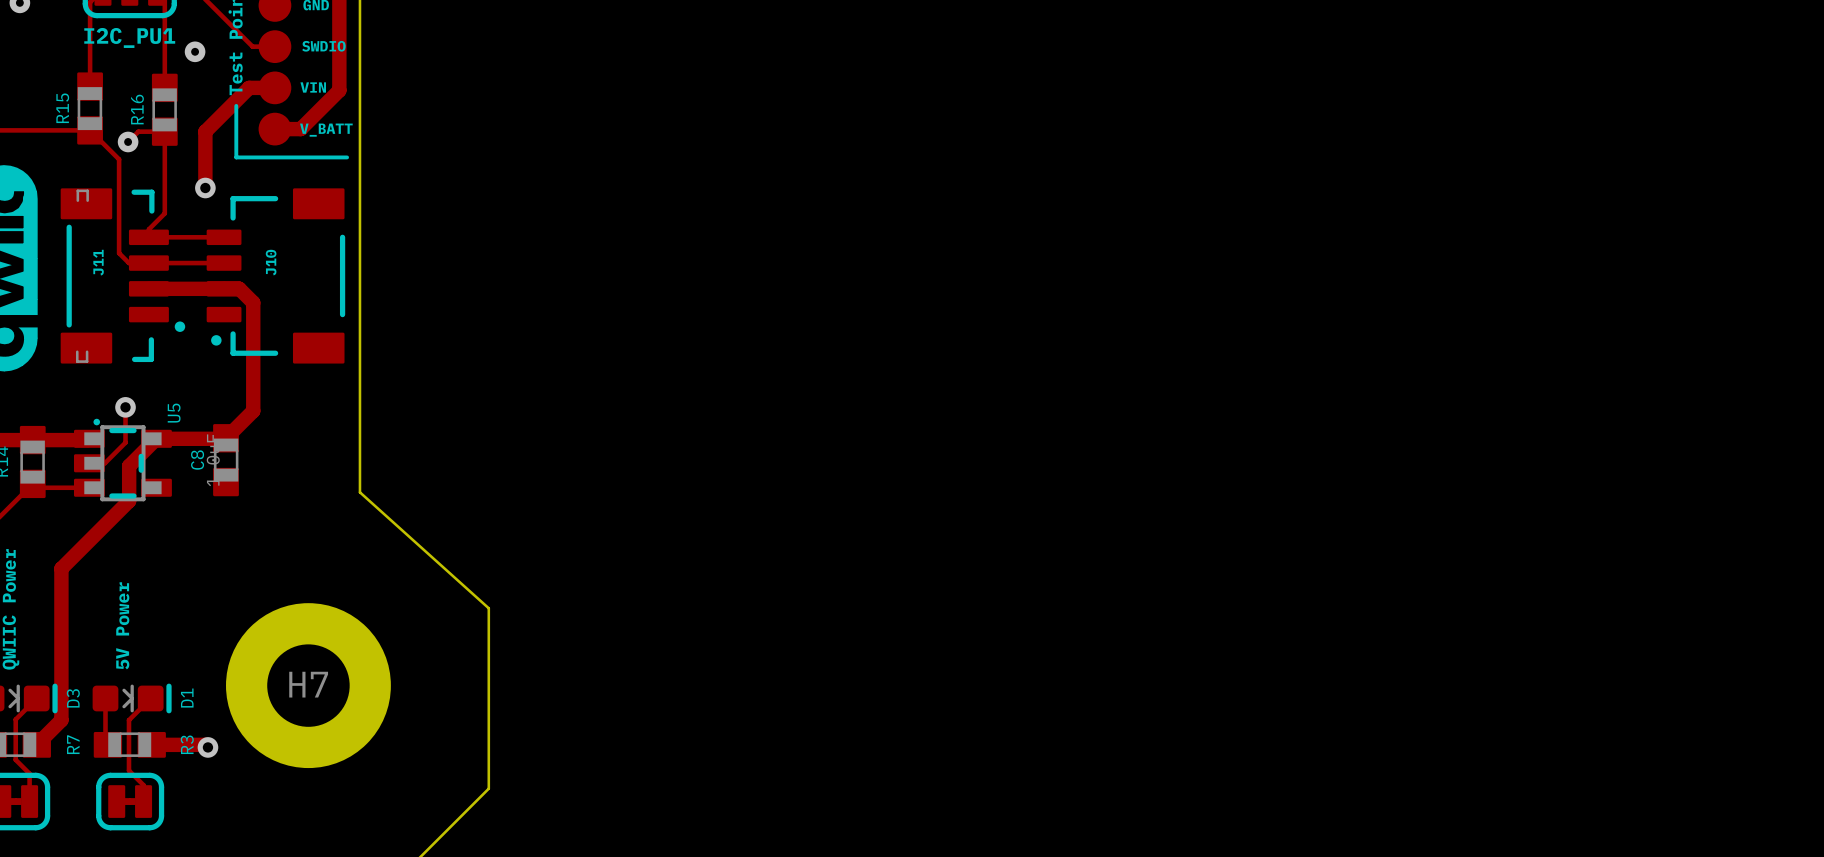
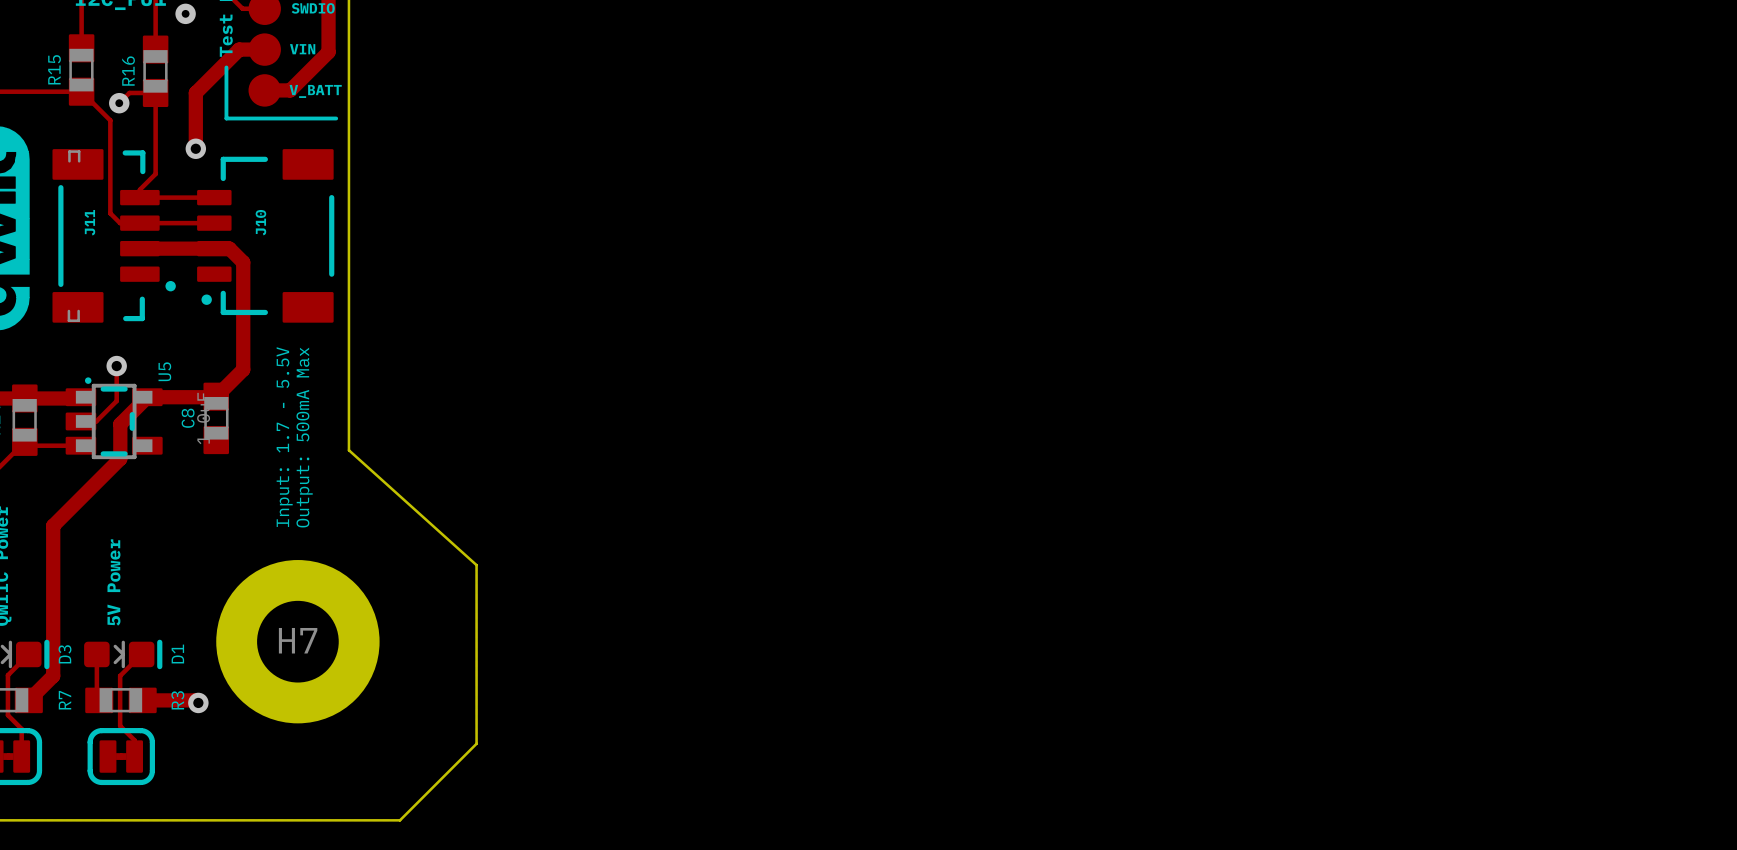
text: none -> Input: 1.7 - 5.5V (284, 437)
text: none -> Output: 500mA Max (304, 437)

